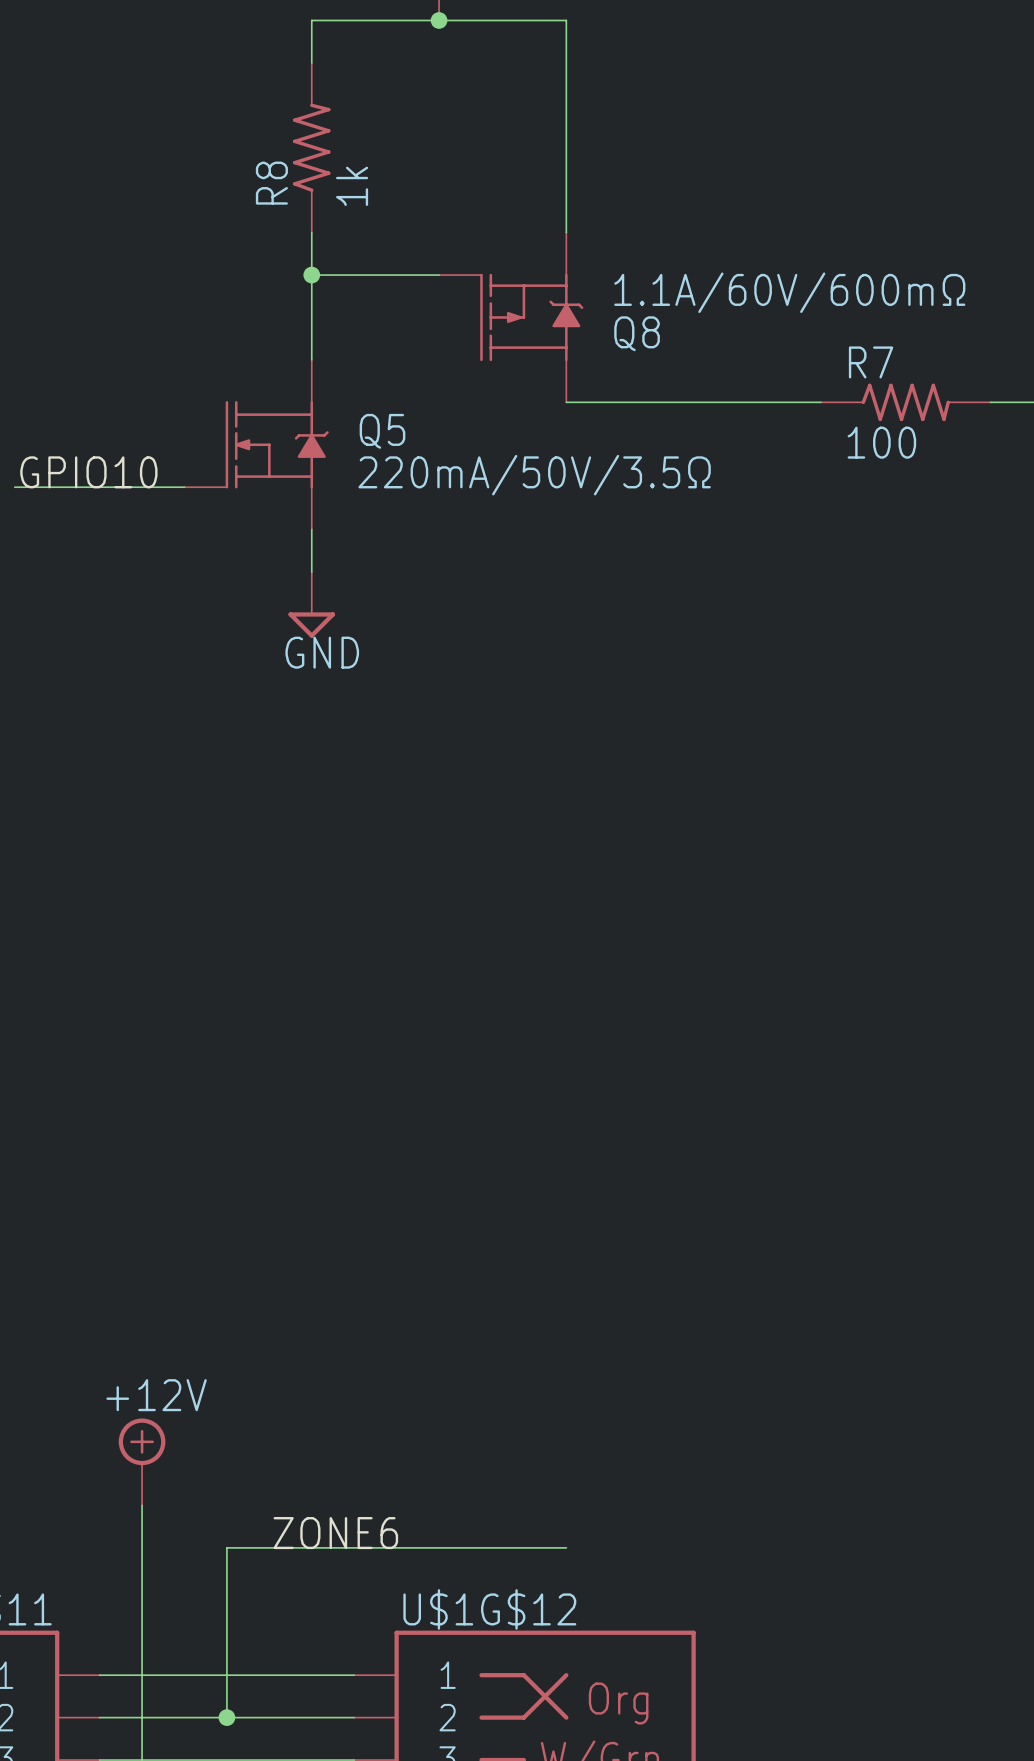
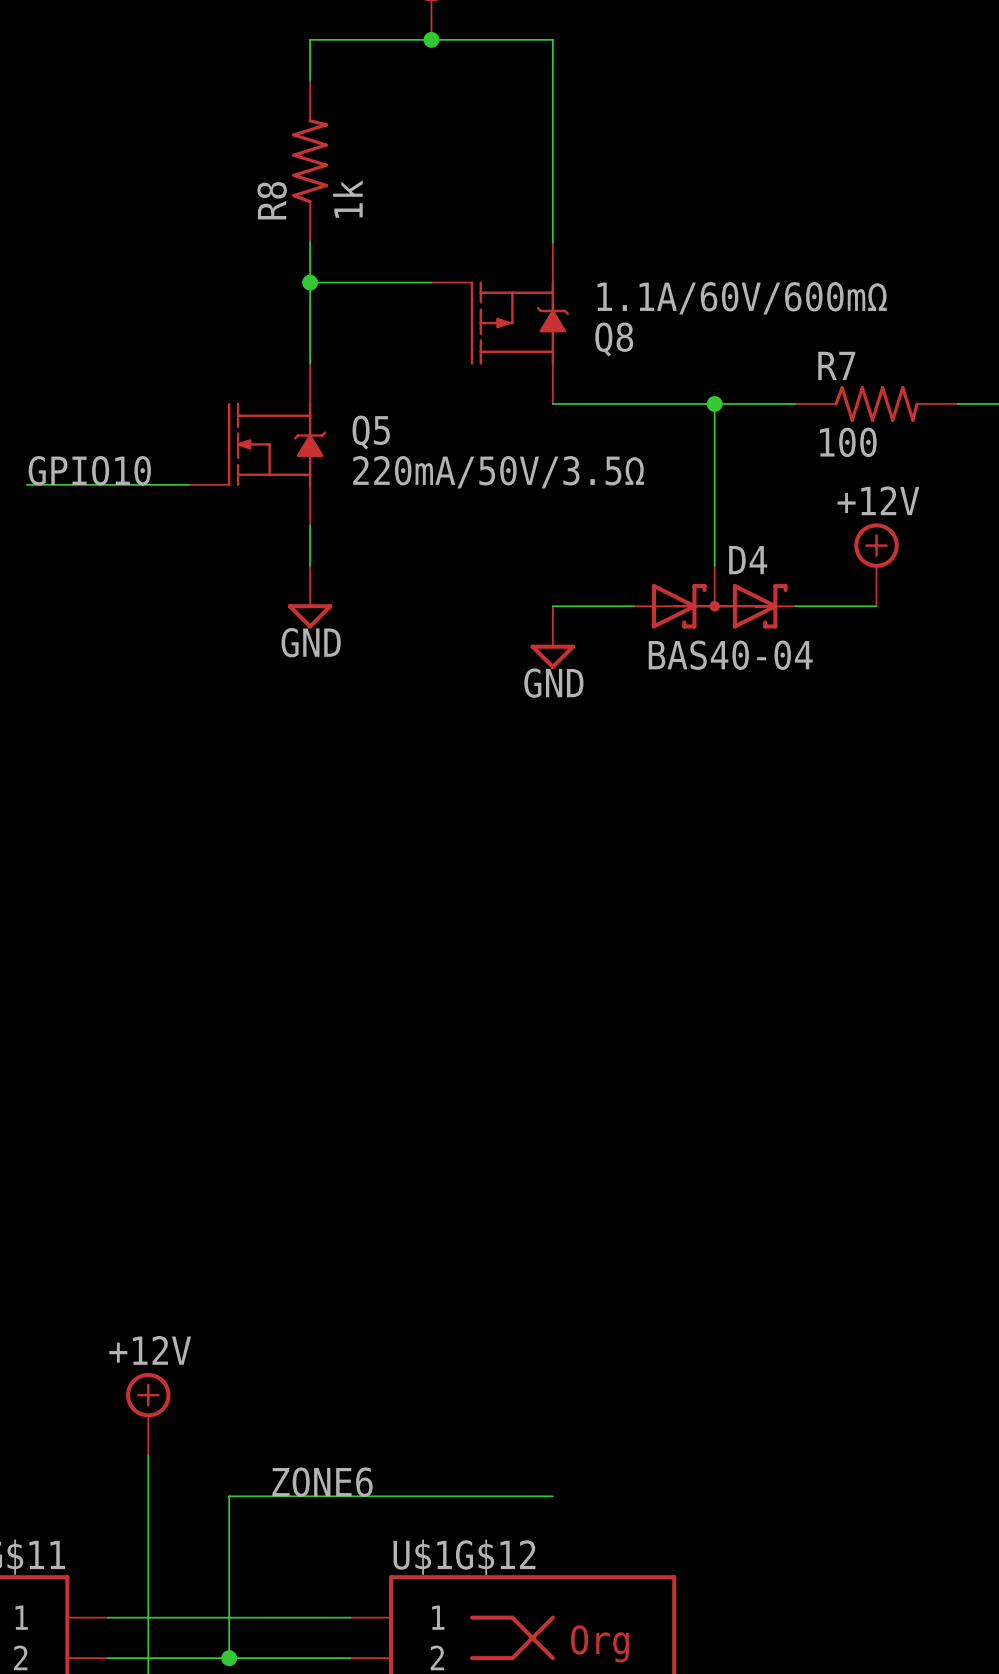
wire: none -> (714, 403) (714, 565)
junction: none -> (714, 403)
power symbol: none -> +12V (876, 564)
D4: none -> BAS40-04 (714, 597)
wire: none -> (552, 606) (633, 606)
wire: none -> (795, 606) (876, 606)
power symbol: none -> GND (552, 637)

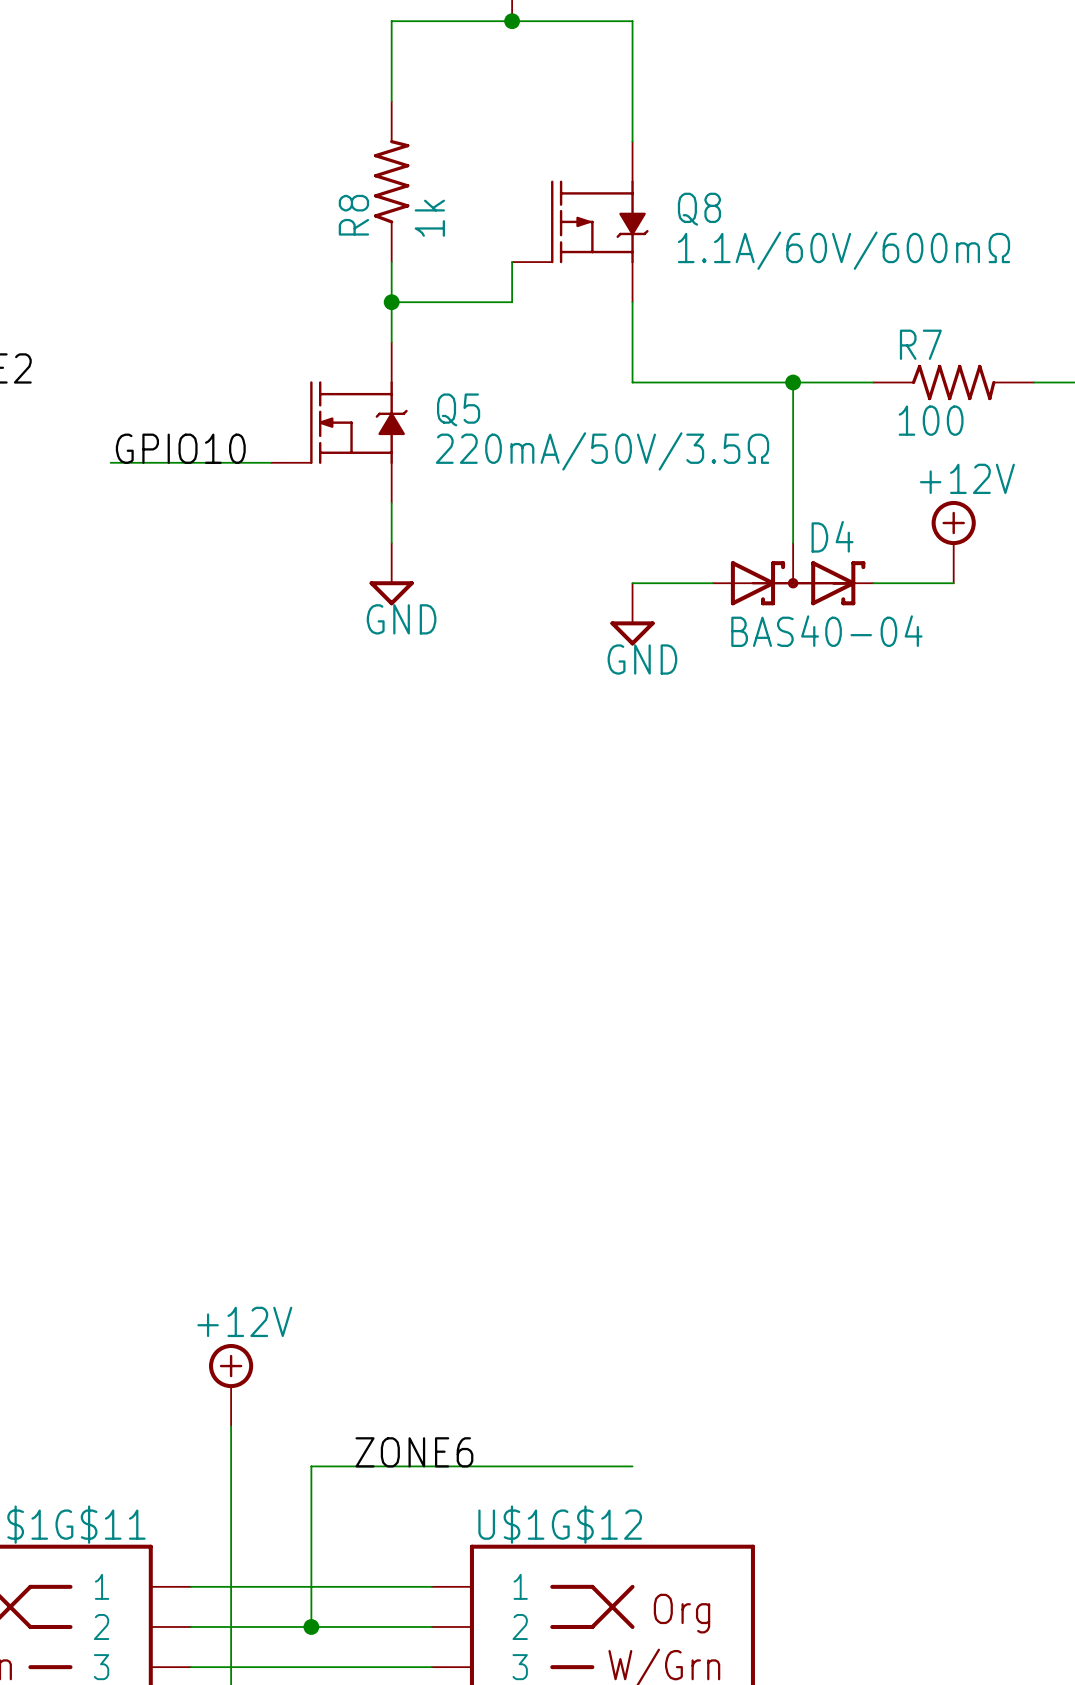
R8 position: (310, 161) -> (391, 181)
wire: (310, 242) (310, 282) (431, 282) -> (391, 302) (512, 302) (512, 262)
junction position: (310, 282) -> (391, 302)
Q8 flip: as is (519, 323) -> up-down (599, 221)

